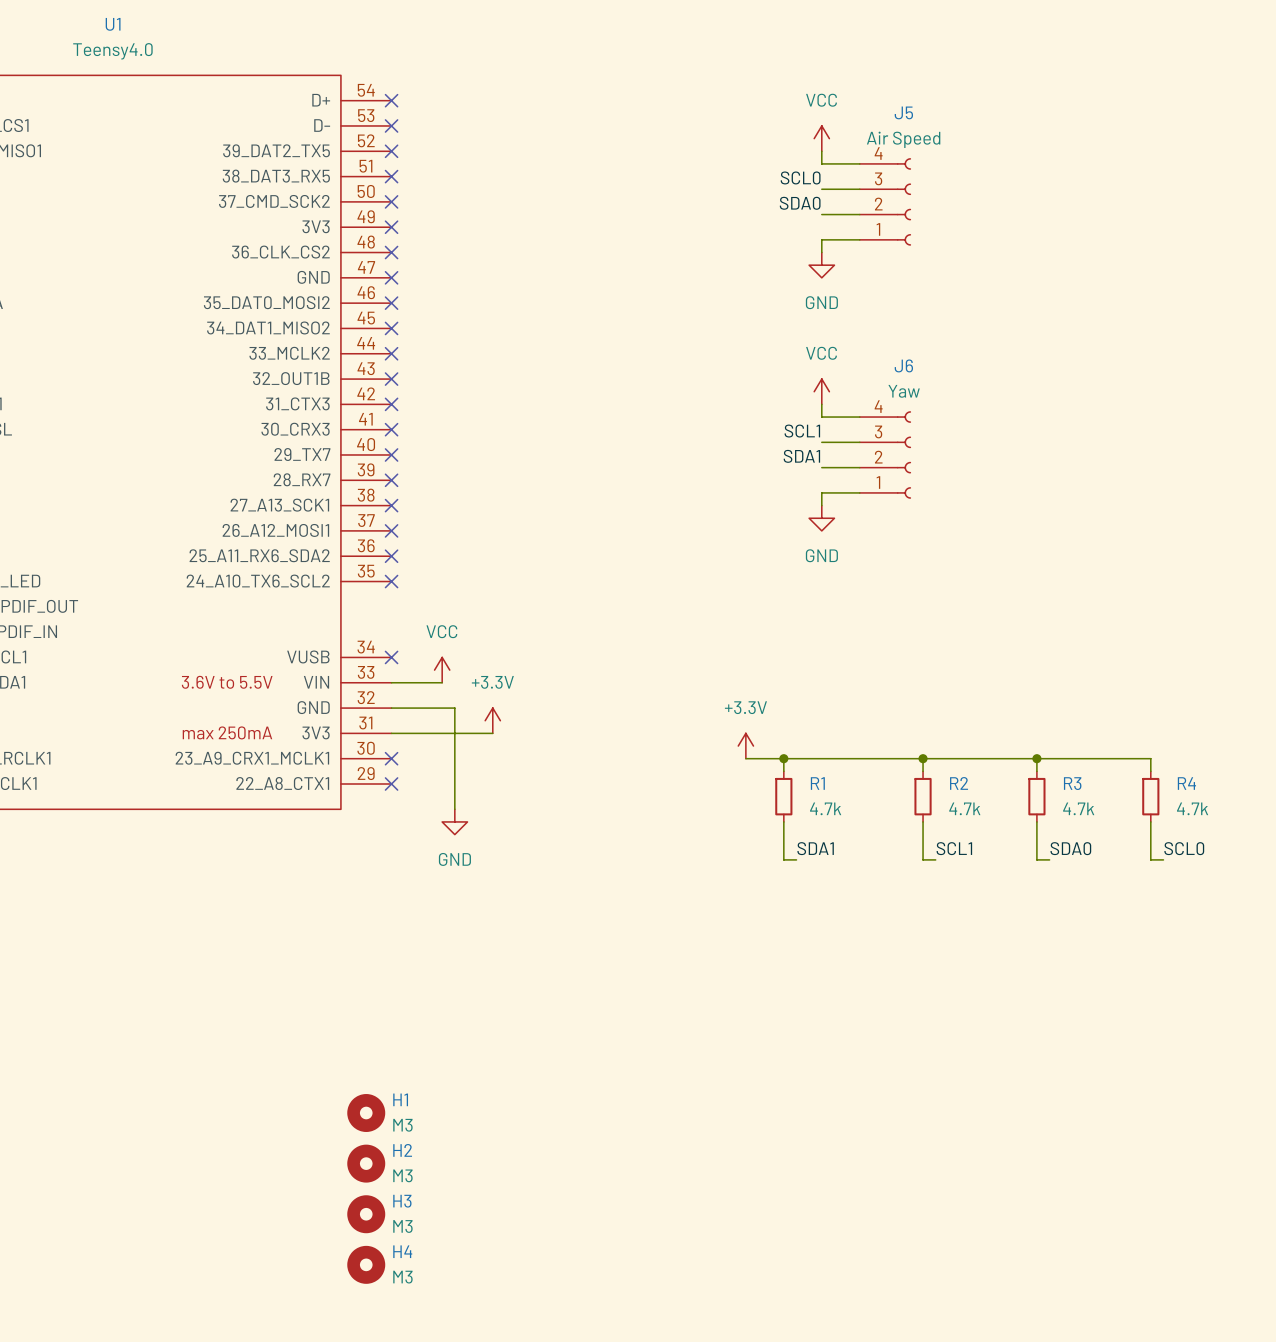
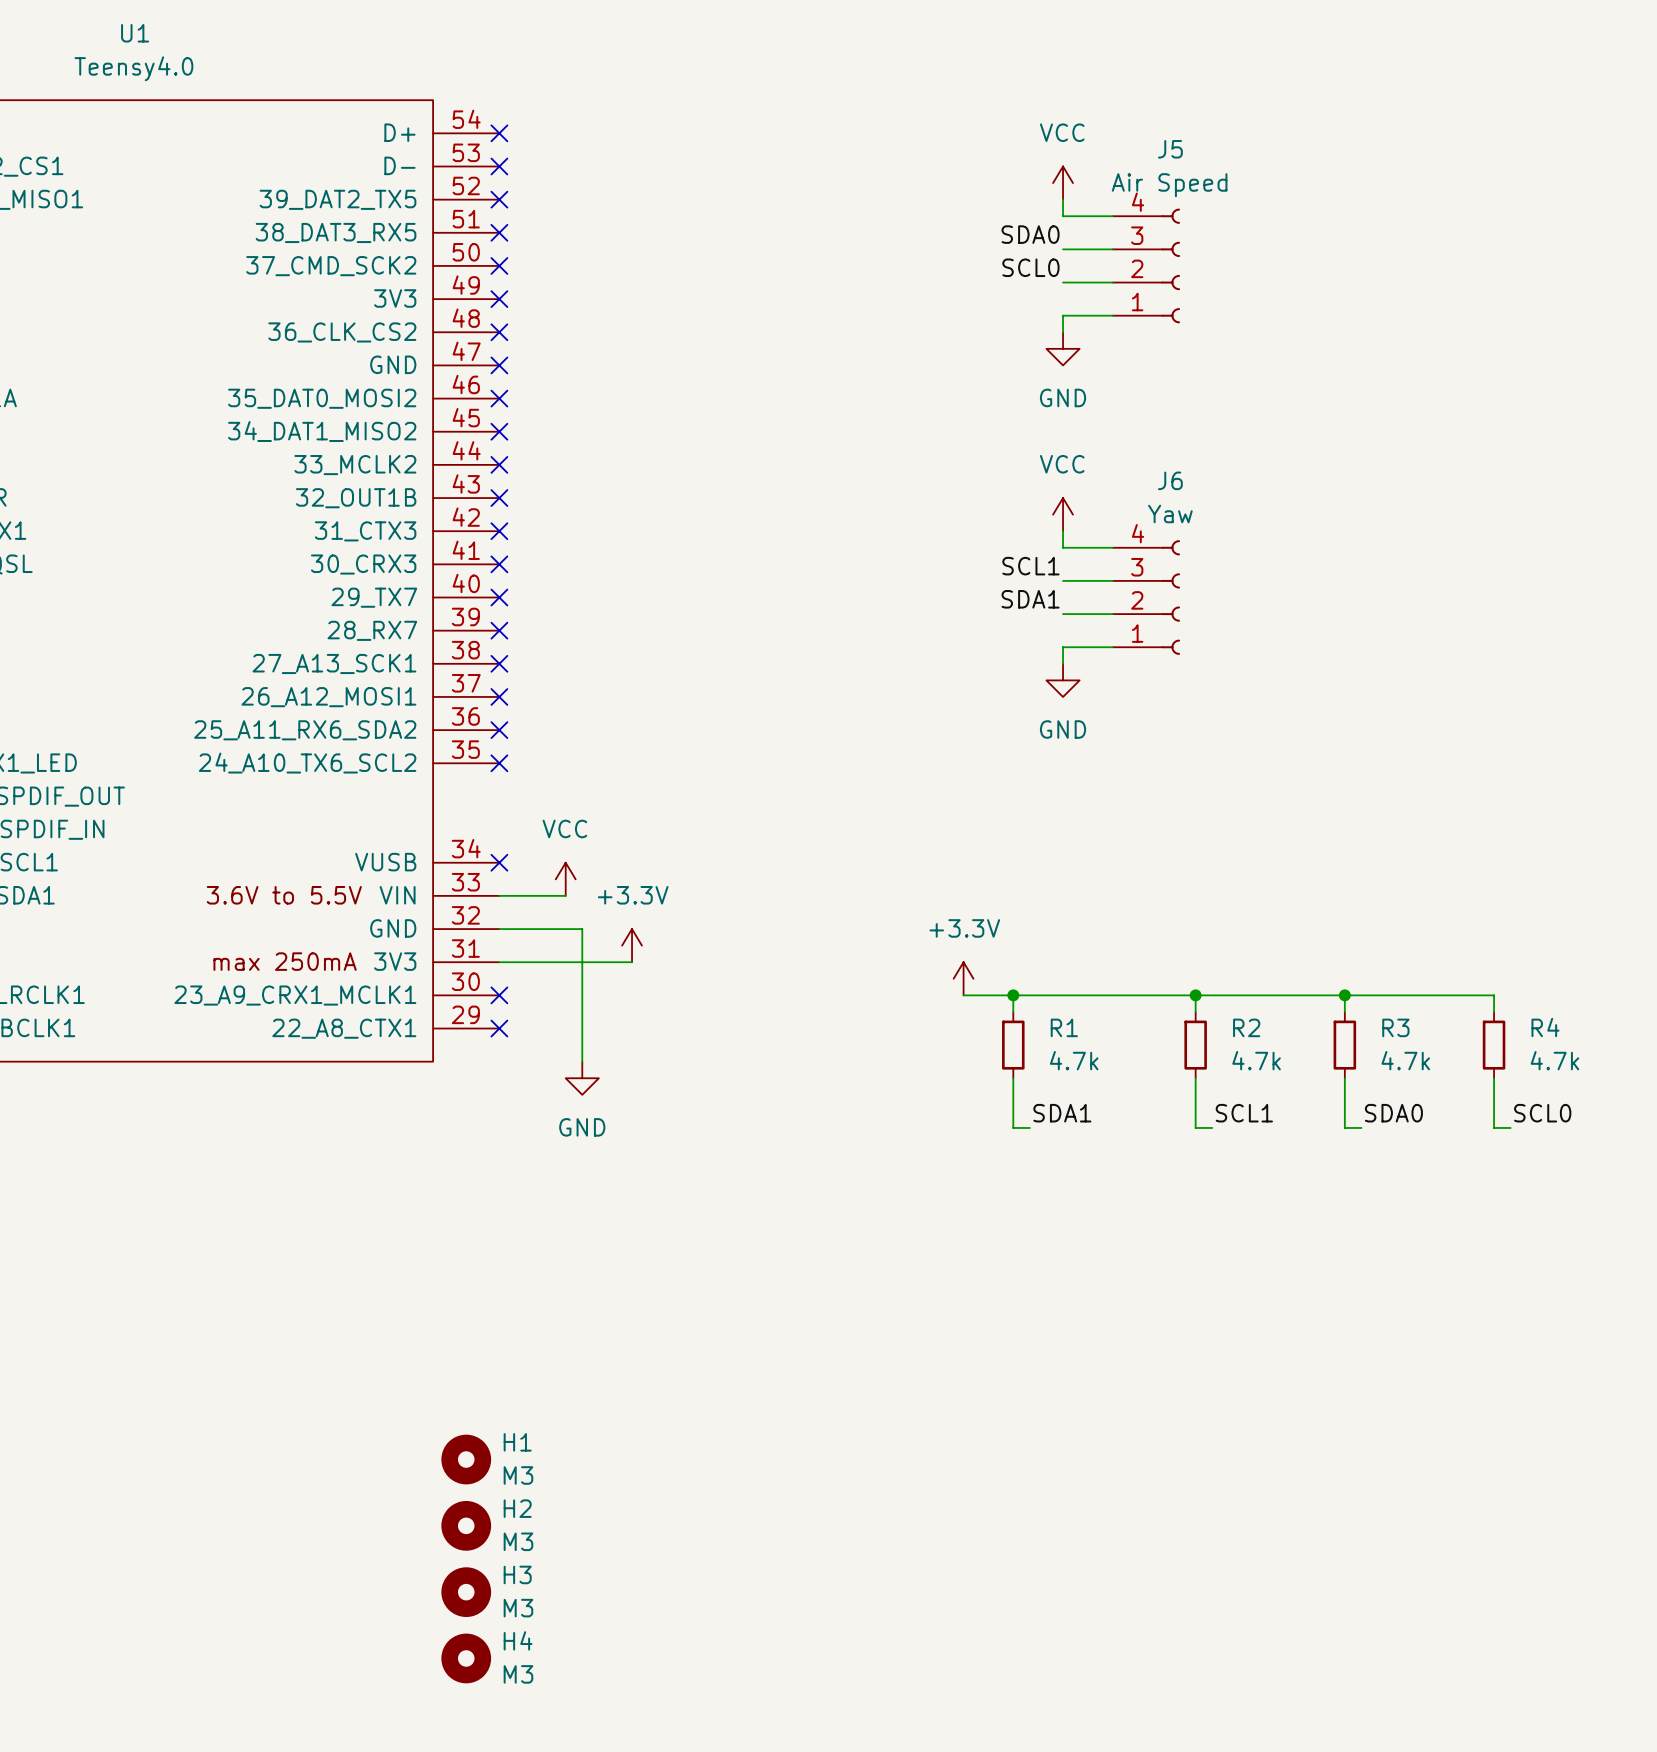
label: SCL0 (800, 177) -> SDA0 (1030, 234)
label: SDA0 (800, 203) -> SCL0 (1030, 267)

